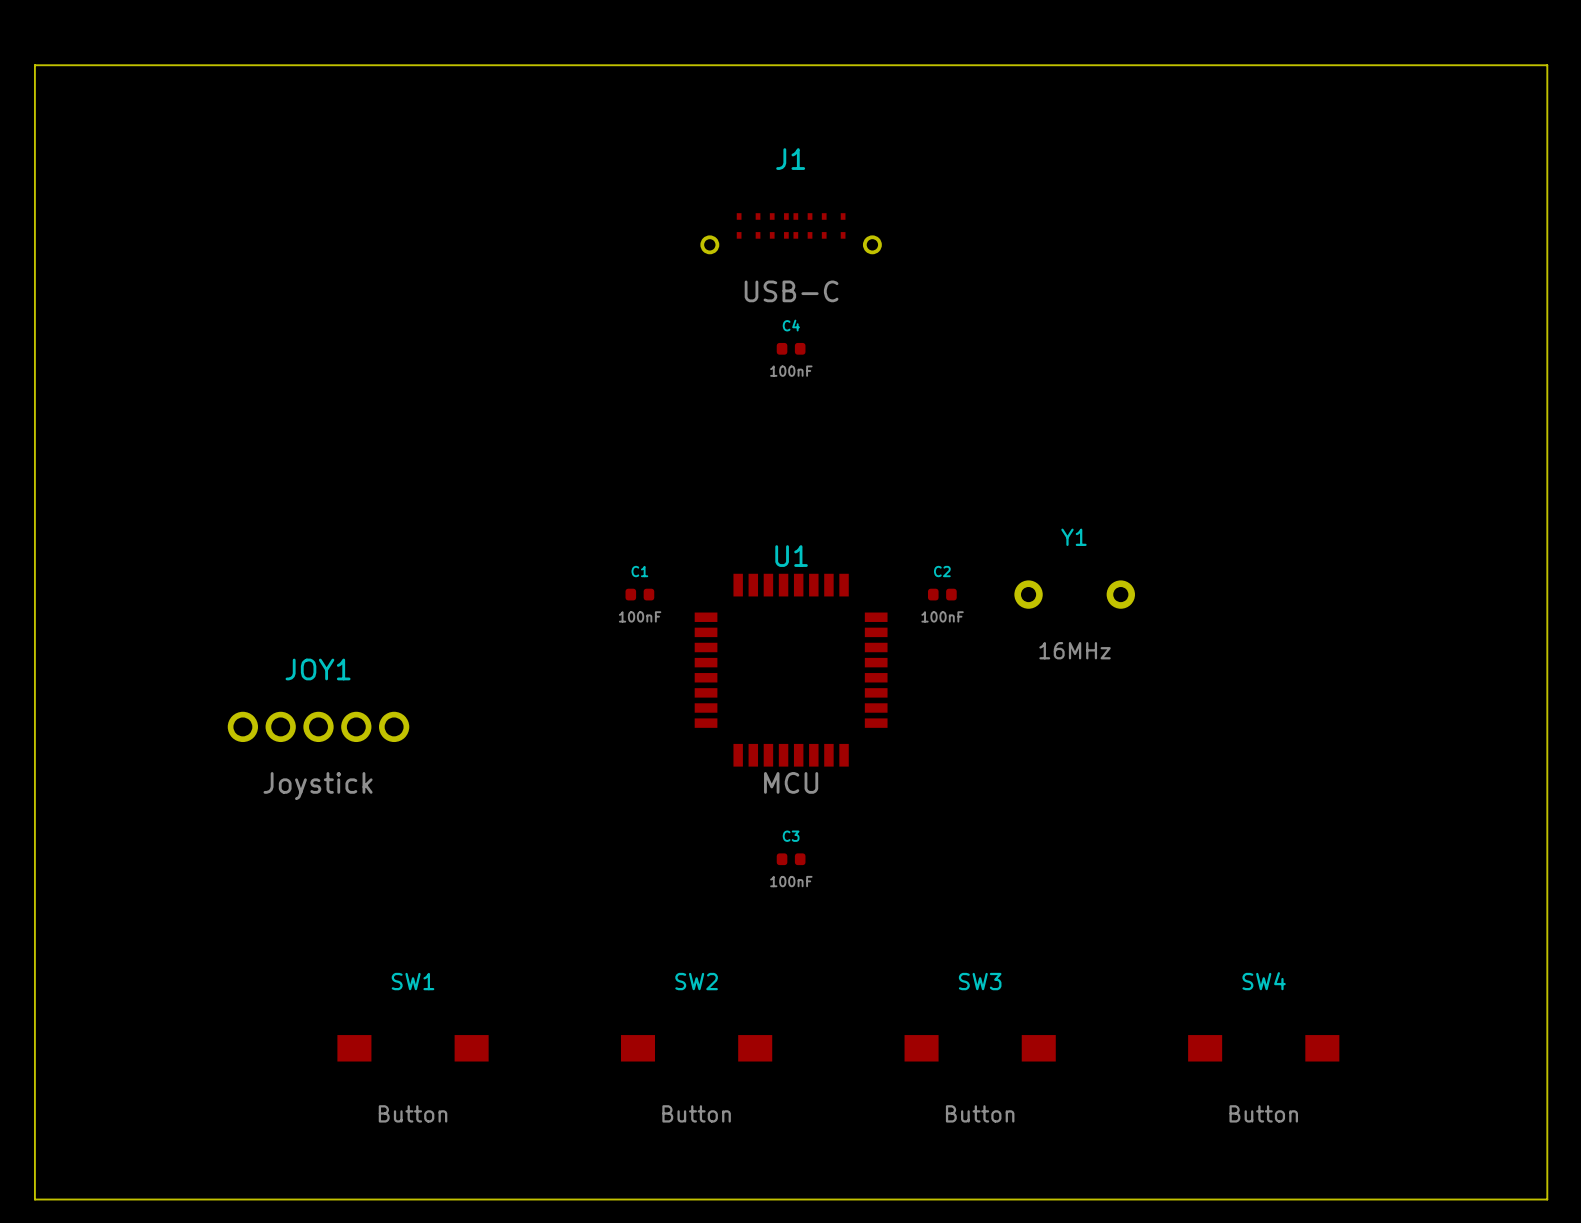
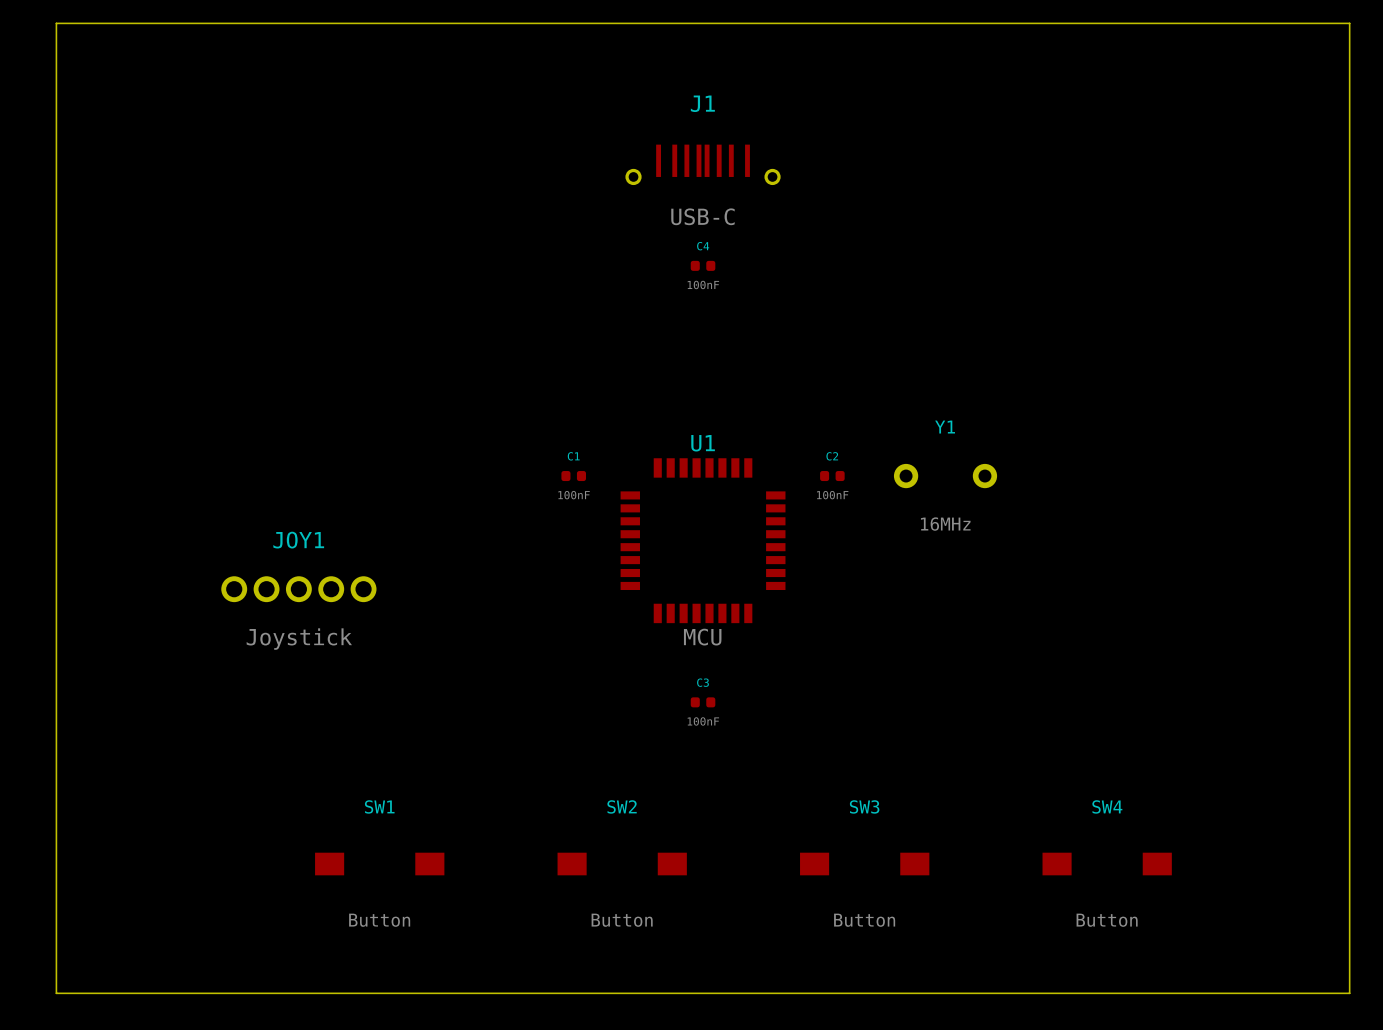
J1 footprint: [700, 213, 882, 255] -> [625, 144, 781, 186]

